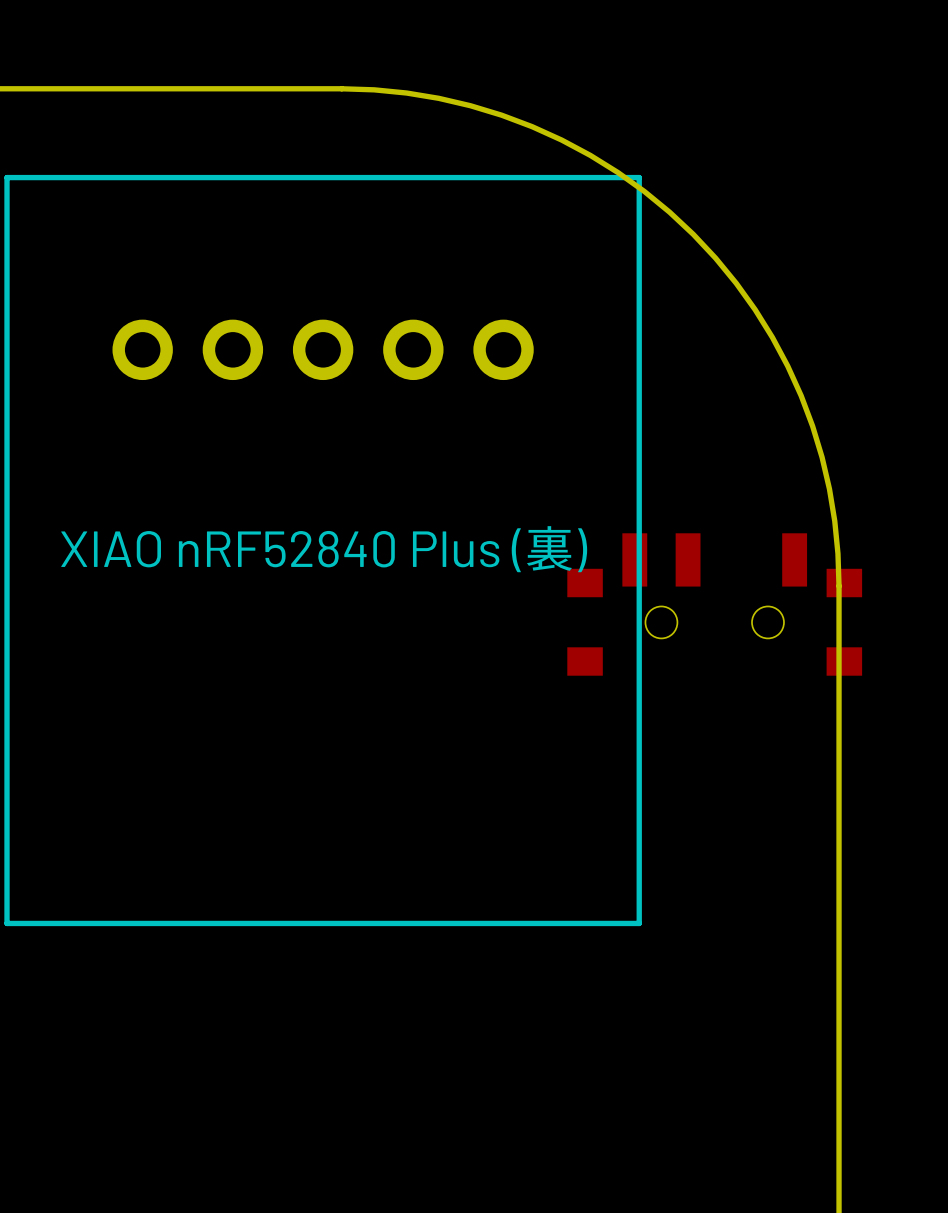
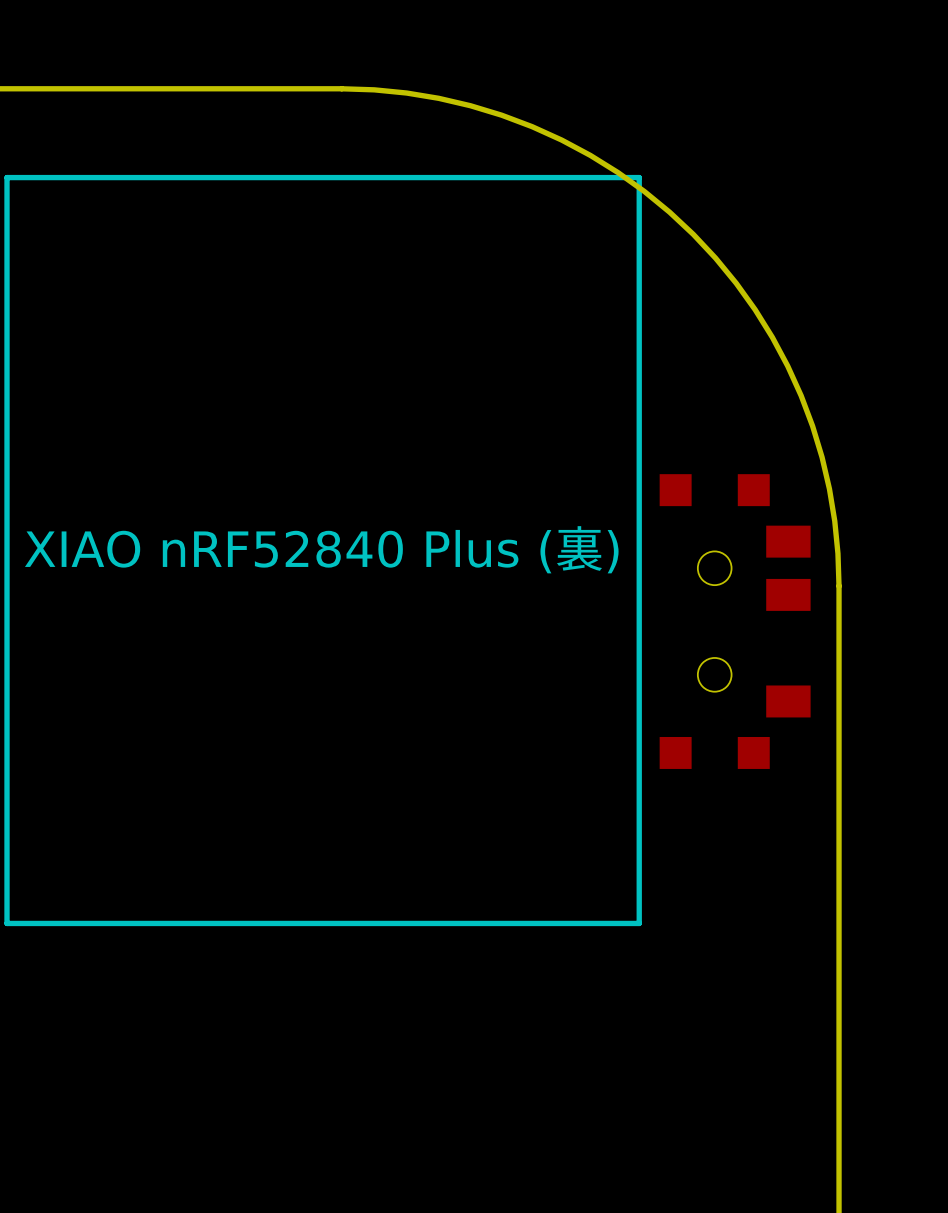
part: (323, 349) -> none
part footprint: [567, 533, 863, 676] -> [659, 474, 811, 769]

